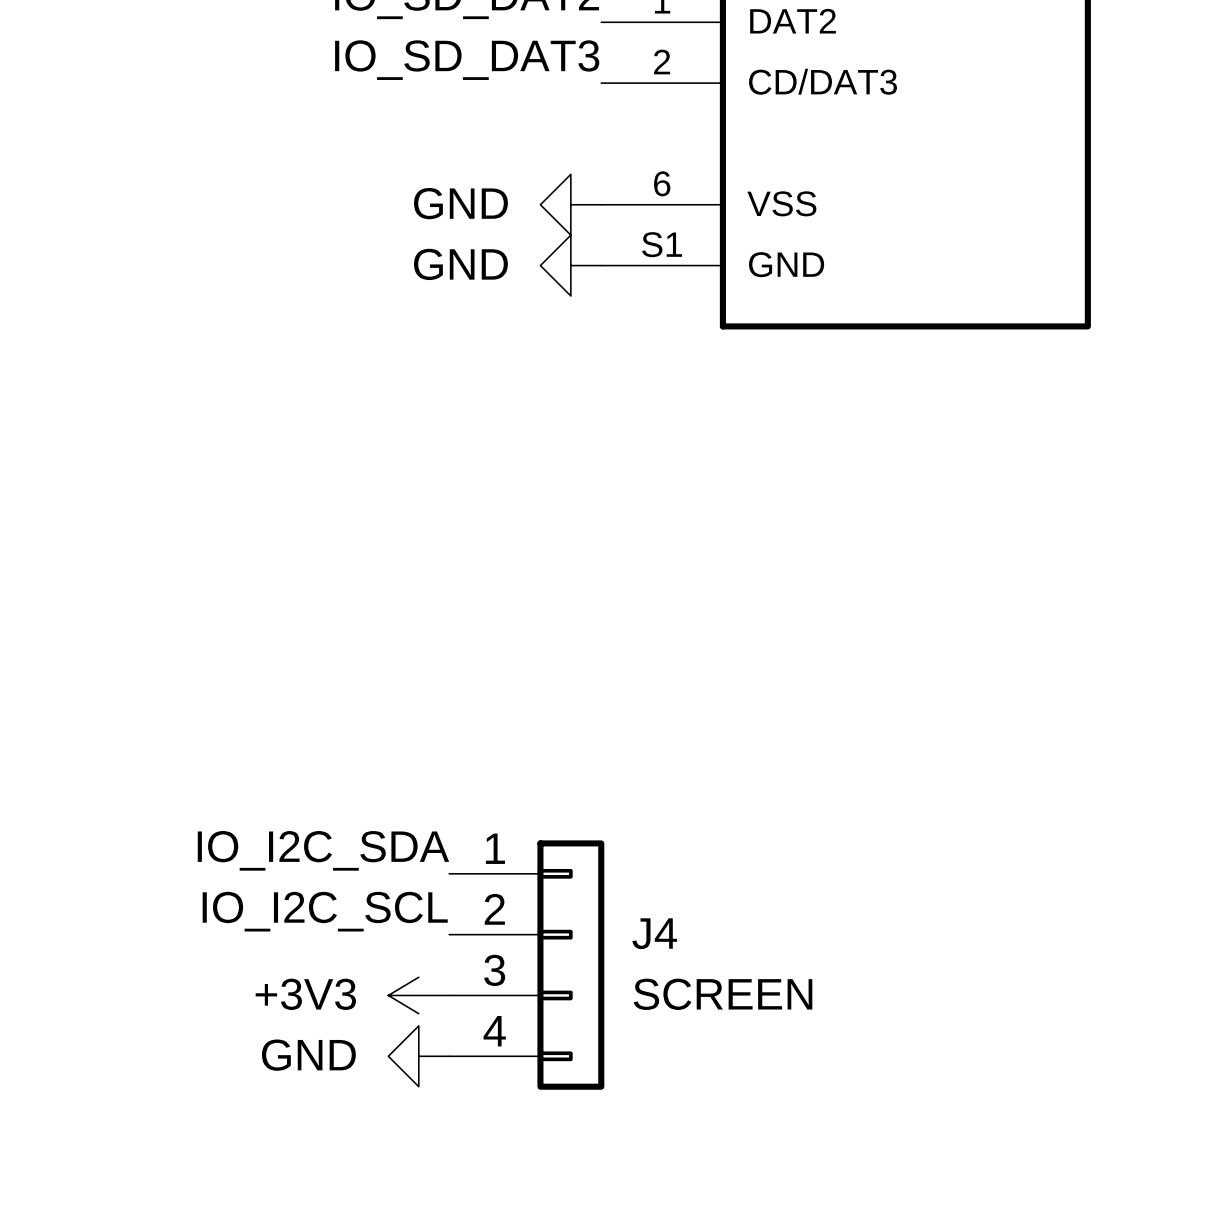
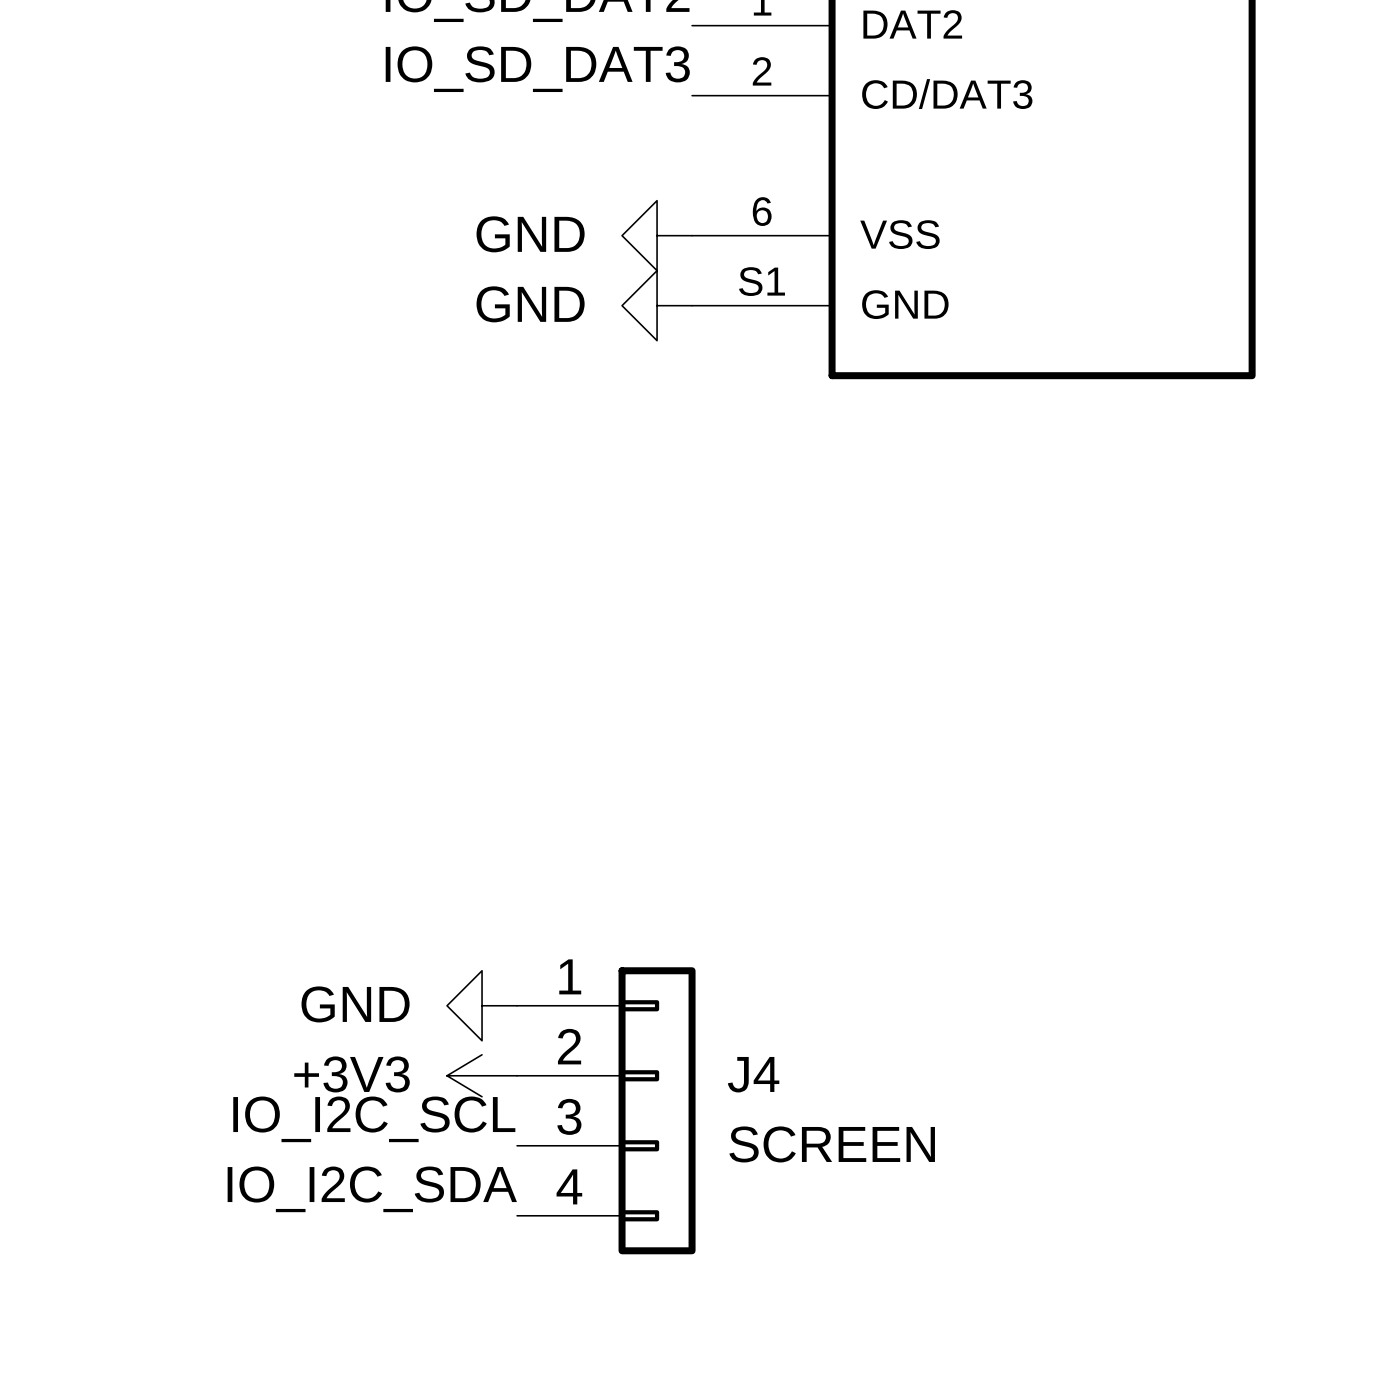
label position: IO_I2C_SDA (323, 850) -> IO_I2C_SDA (372, 1189)
label position: IO_I2C_SCL (325, 911) -> IO_I2C_SCL (374, 1119)
power symbol position: +3V3 (418, 995) -> +3V3 (482, 1075)
power symbol position: GND (418, 1056) -> GND (482, 1005)

